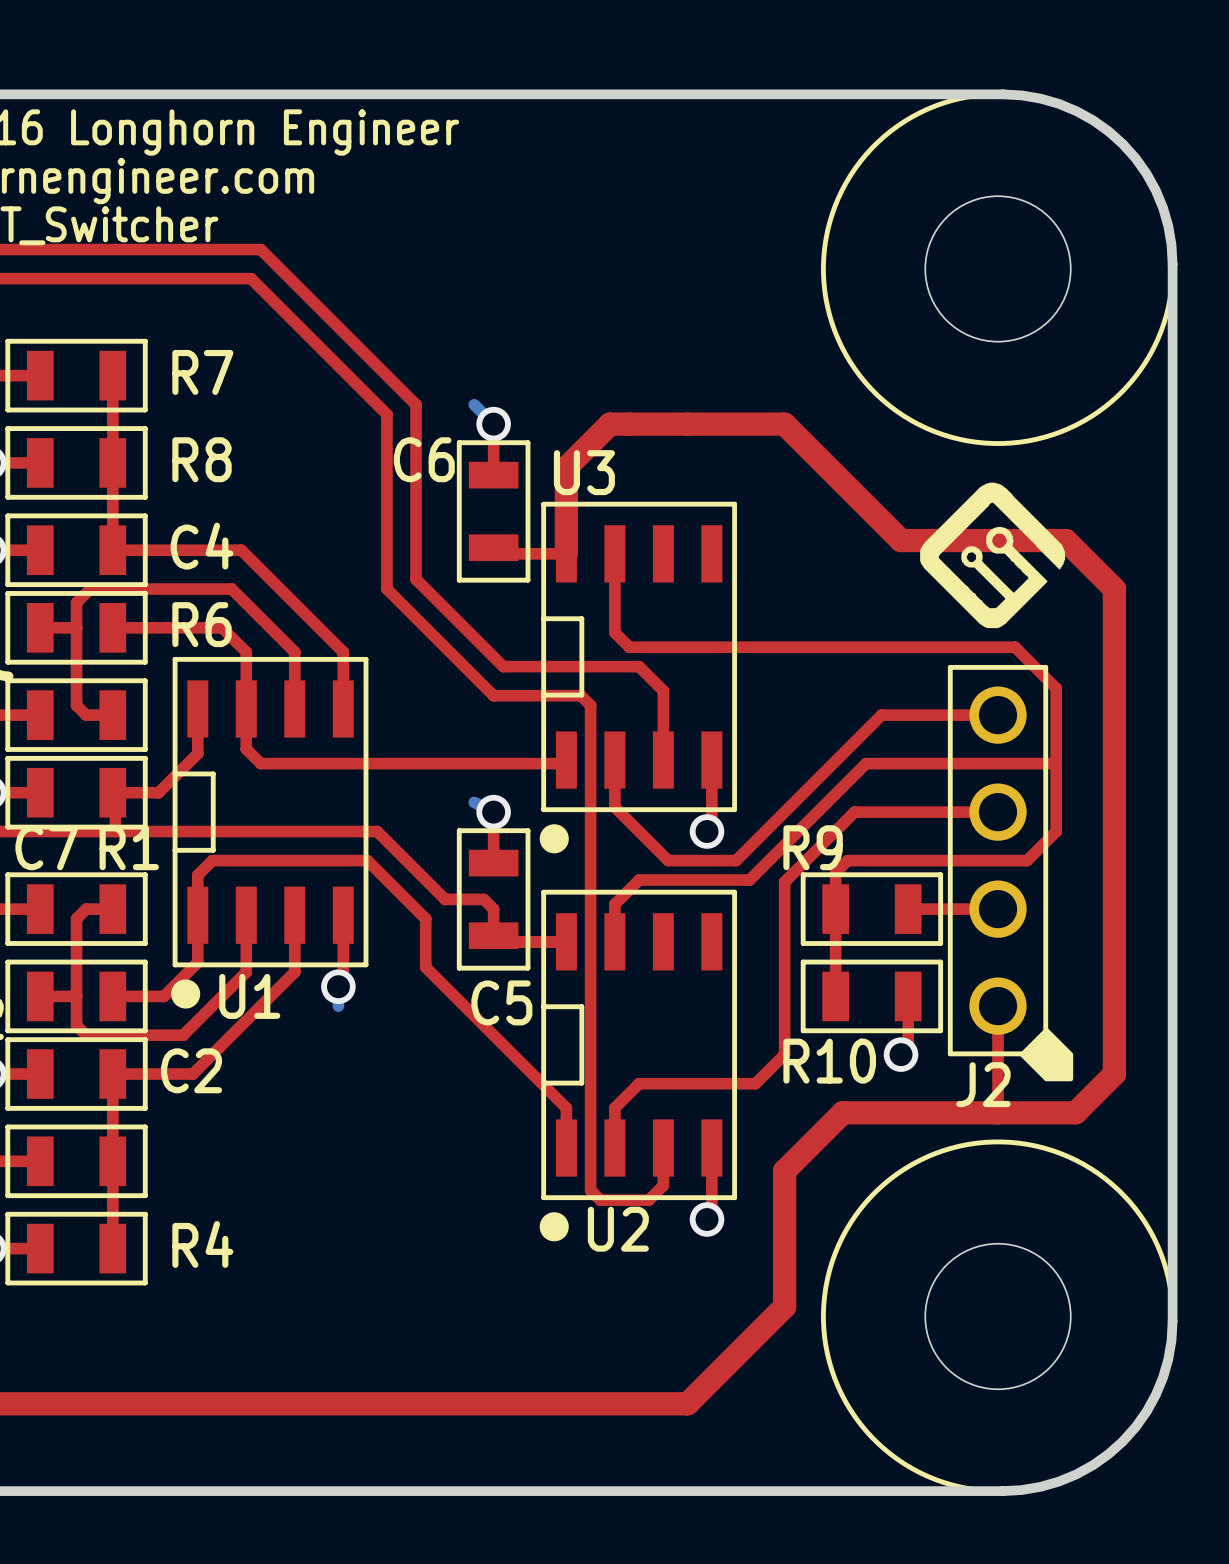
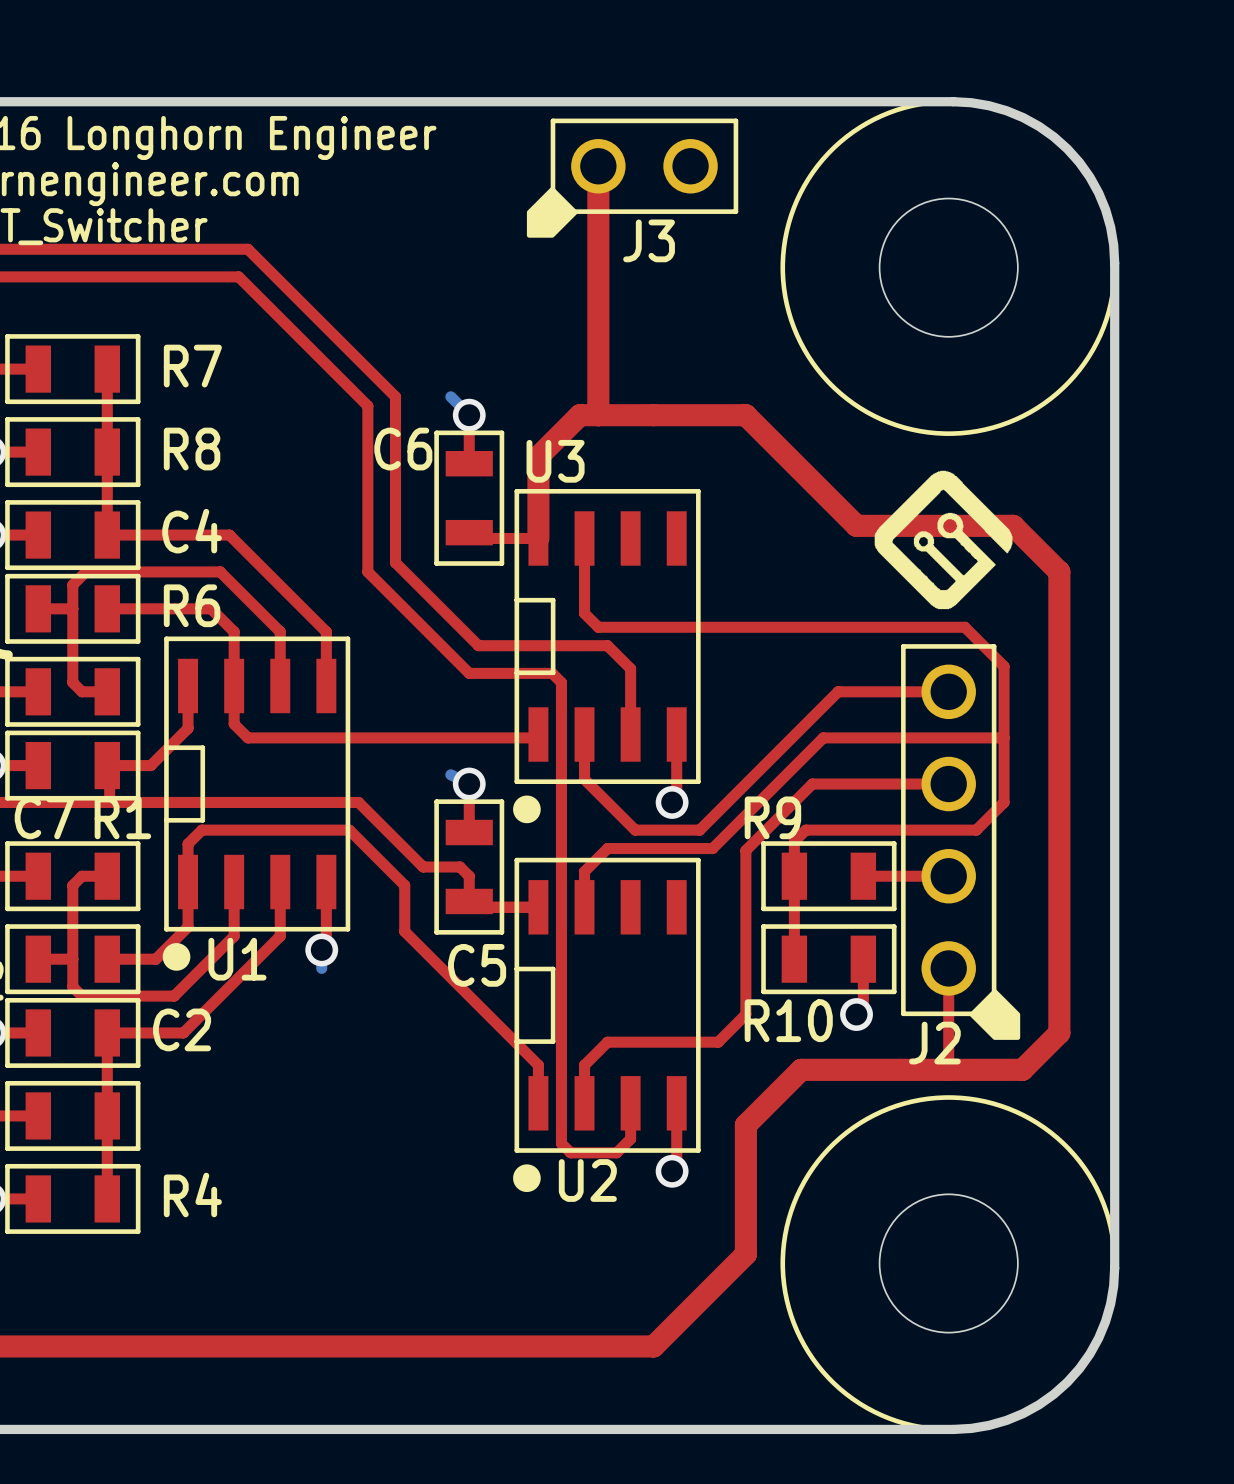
top track: none -> (598, 166) (598, 415)
J3: none -> (632, 178)

